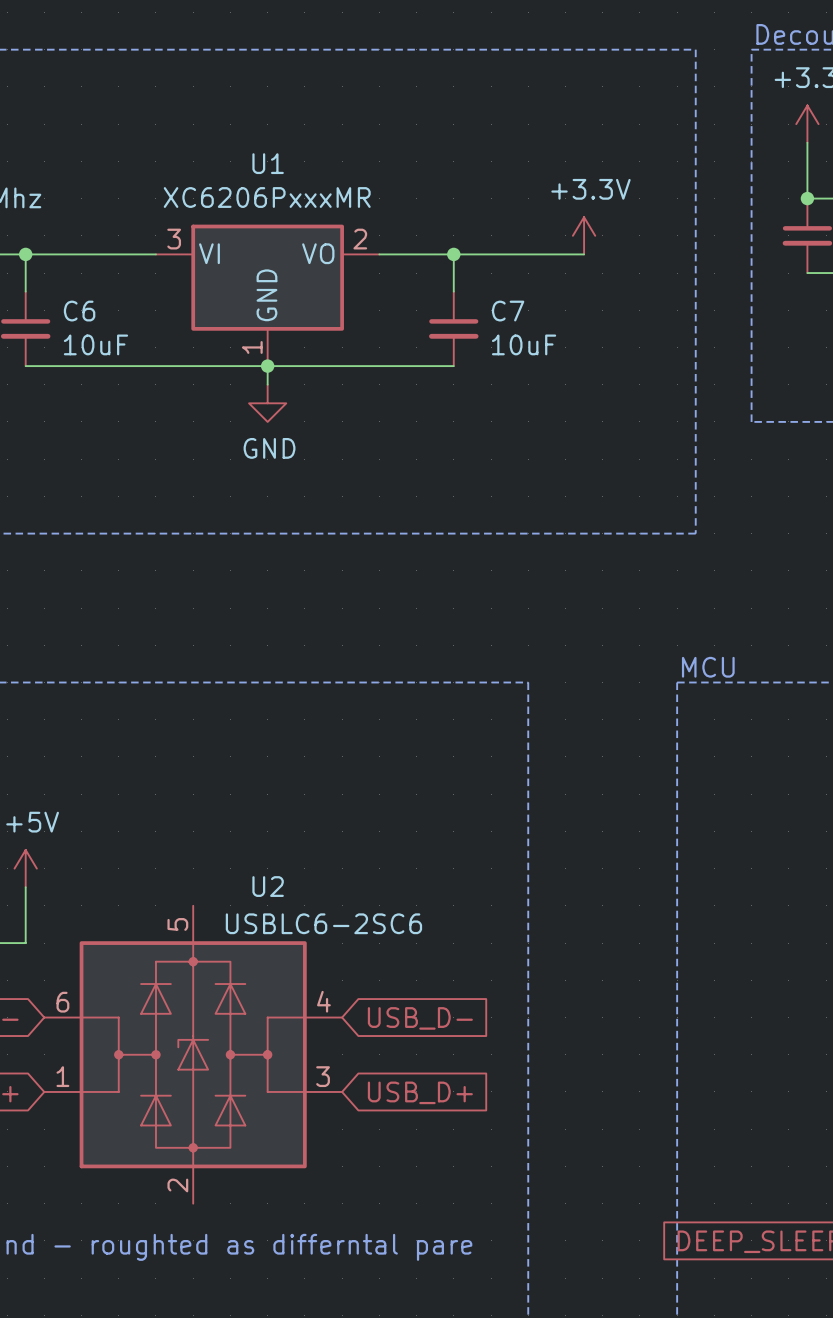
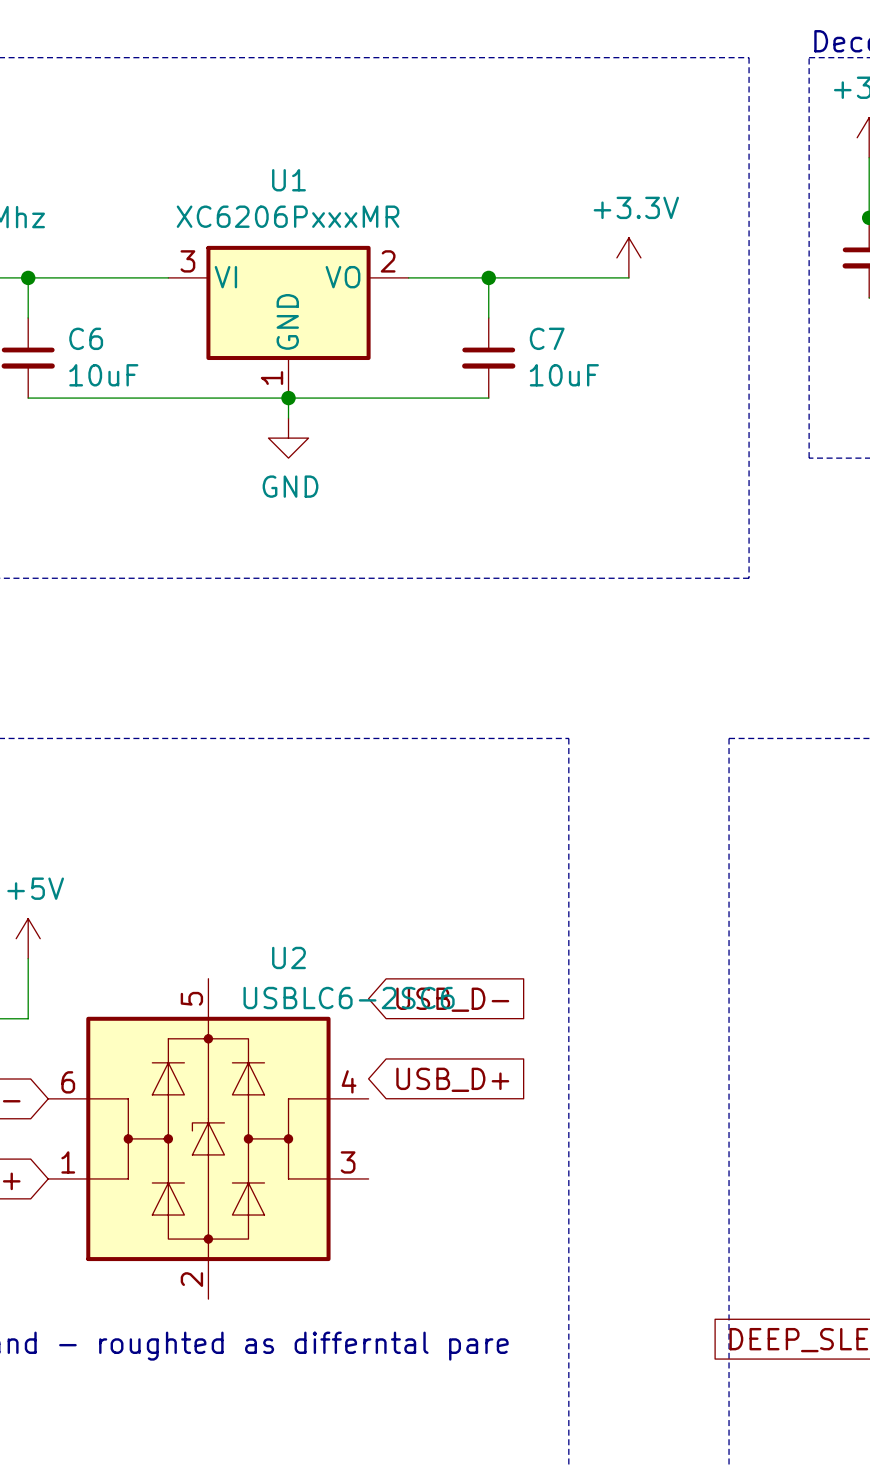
text: MCU (708, 667) -> none
global label position: USB_D- (420, 1018) -> USB_D- (452, 999)
global label position: USB_D+ (420, 1092) -> USB_D+ (452, 1079)

